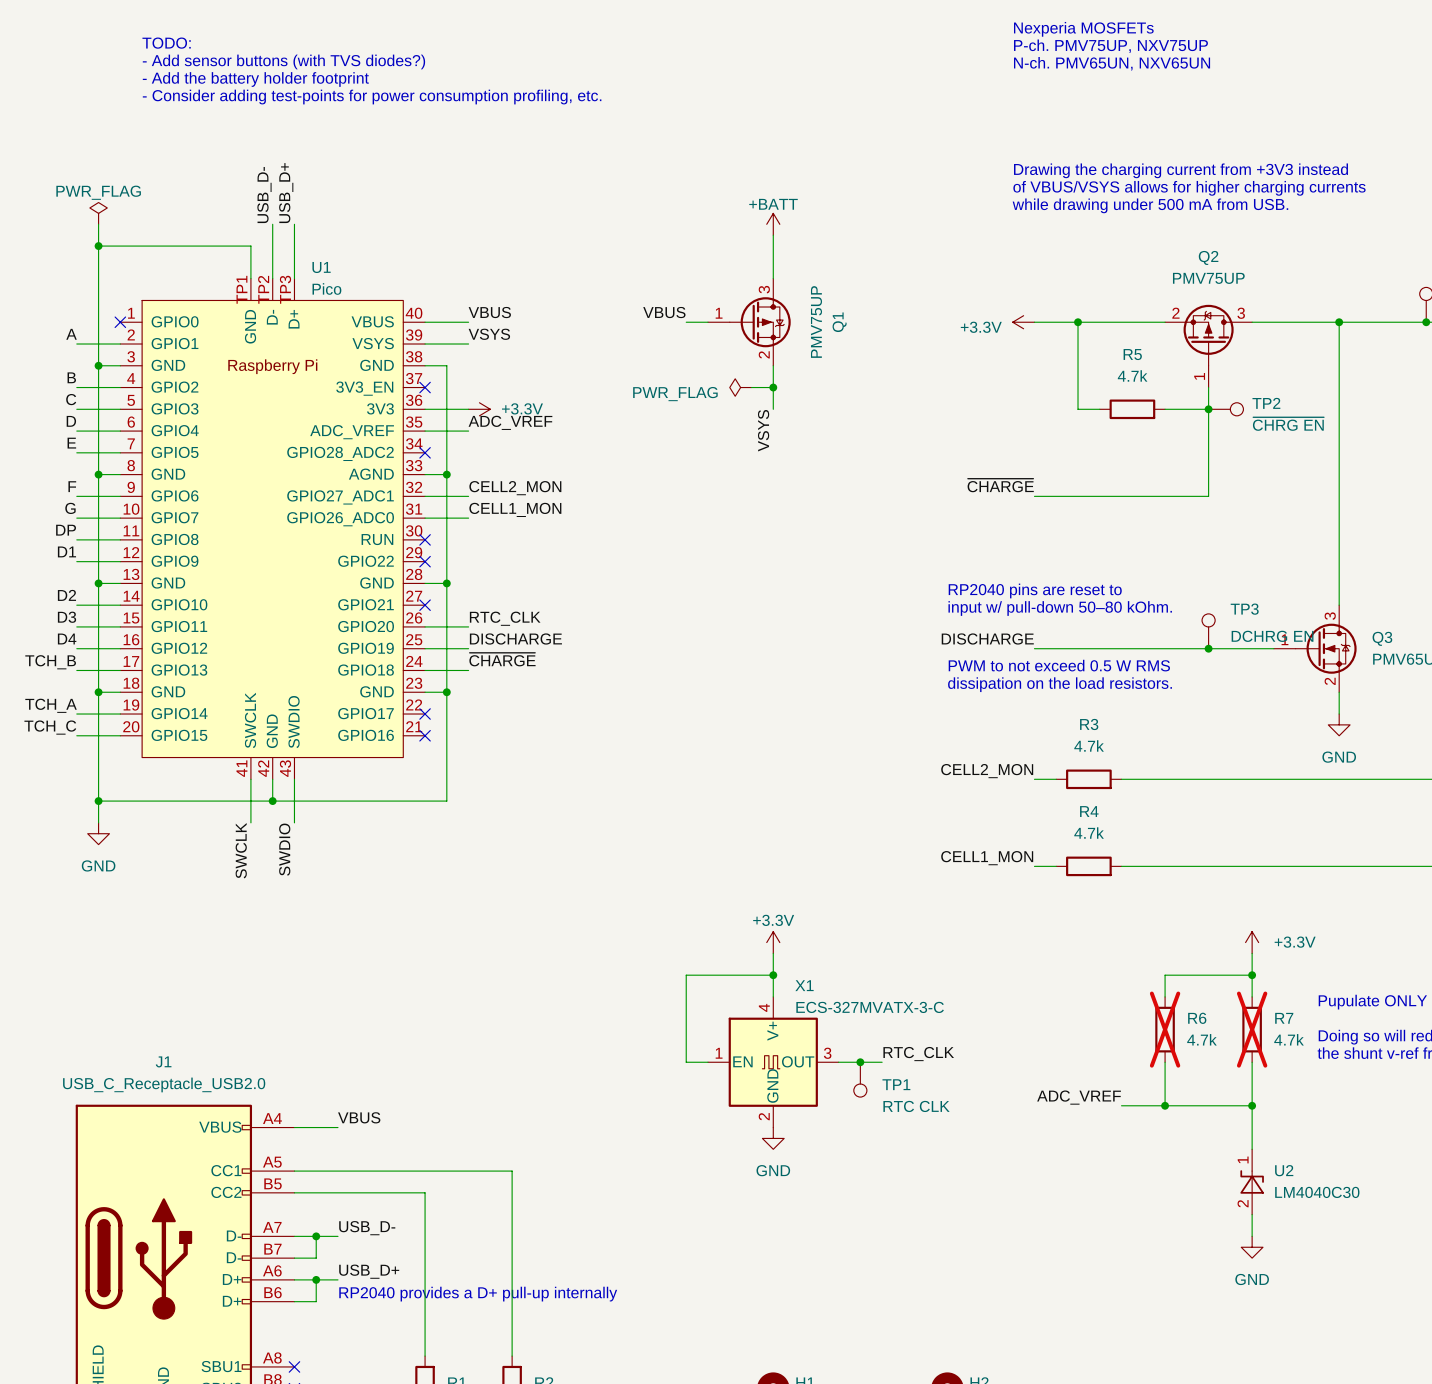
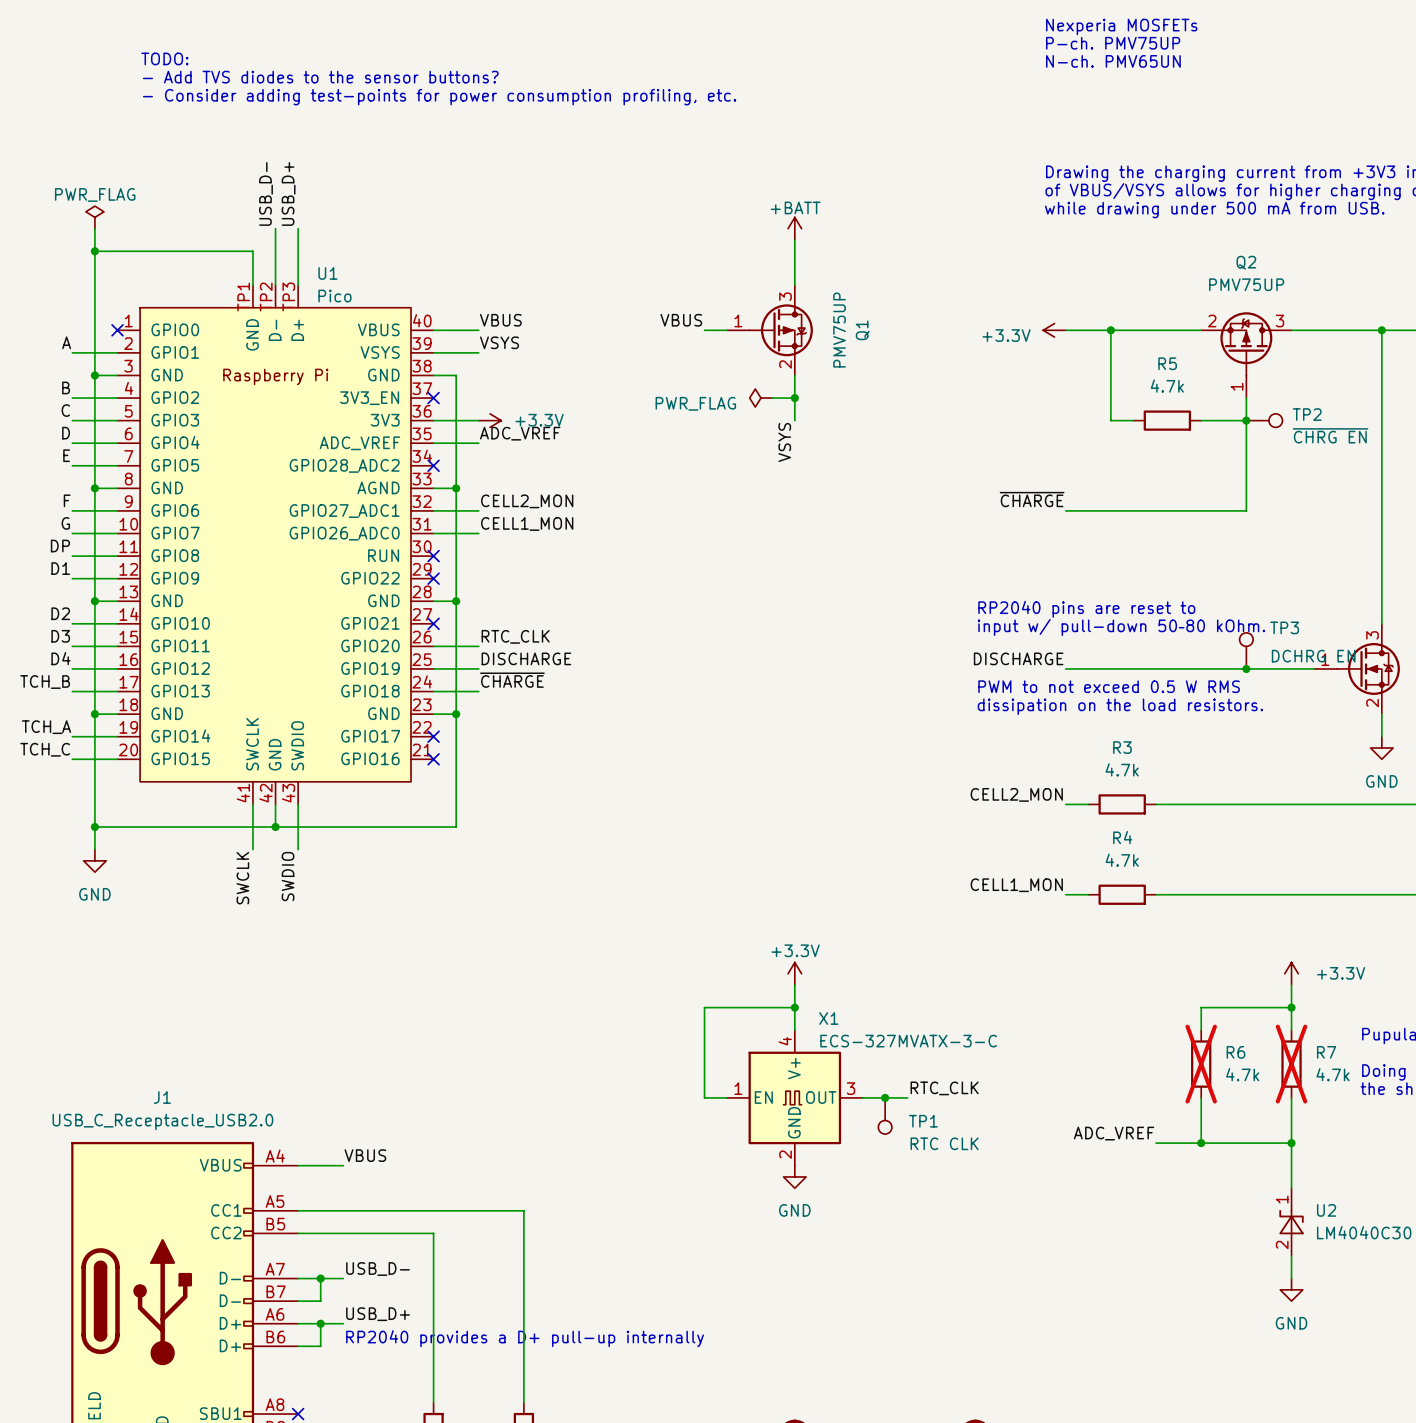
text: TODO: (166, 43) -> none
text: P-ch. PMV75UP, NXV75UP (1110, 46) -> P-ch. PMV75UP (1113, 43)
text: - Add sensor buttons (with TVS diodes?) (283, 61) -> TODO: (164, 58)
text: N-ch. PMV65UN, NXV65UN (1112, 63) -> N-ch. PMV65UN (1113, 61)
text: - Add the battery holder footprint (255, 79) -> - Add TVS diodes to the sensor buttons? (320, 77)

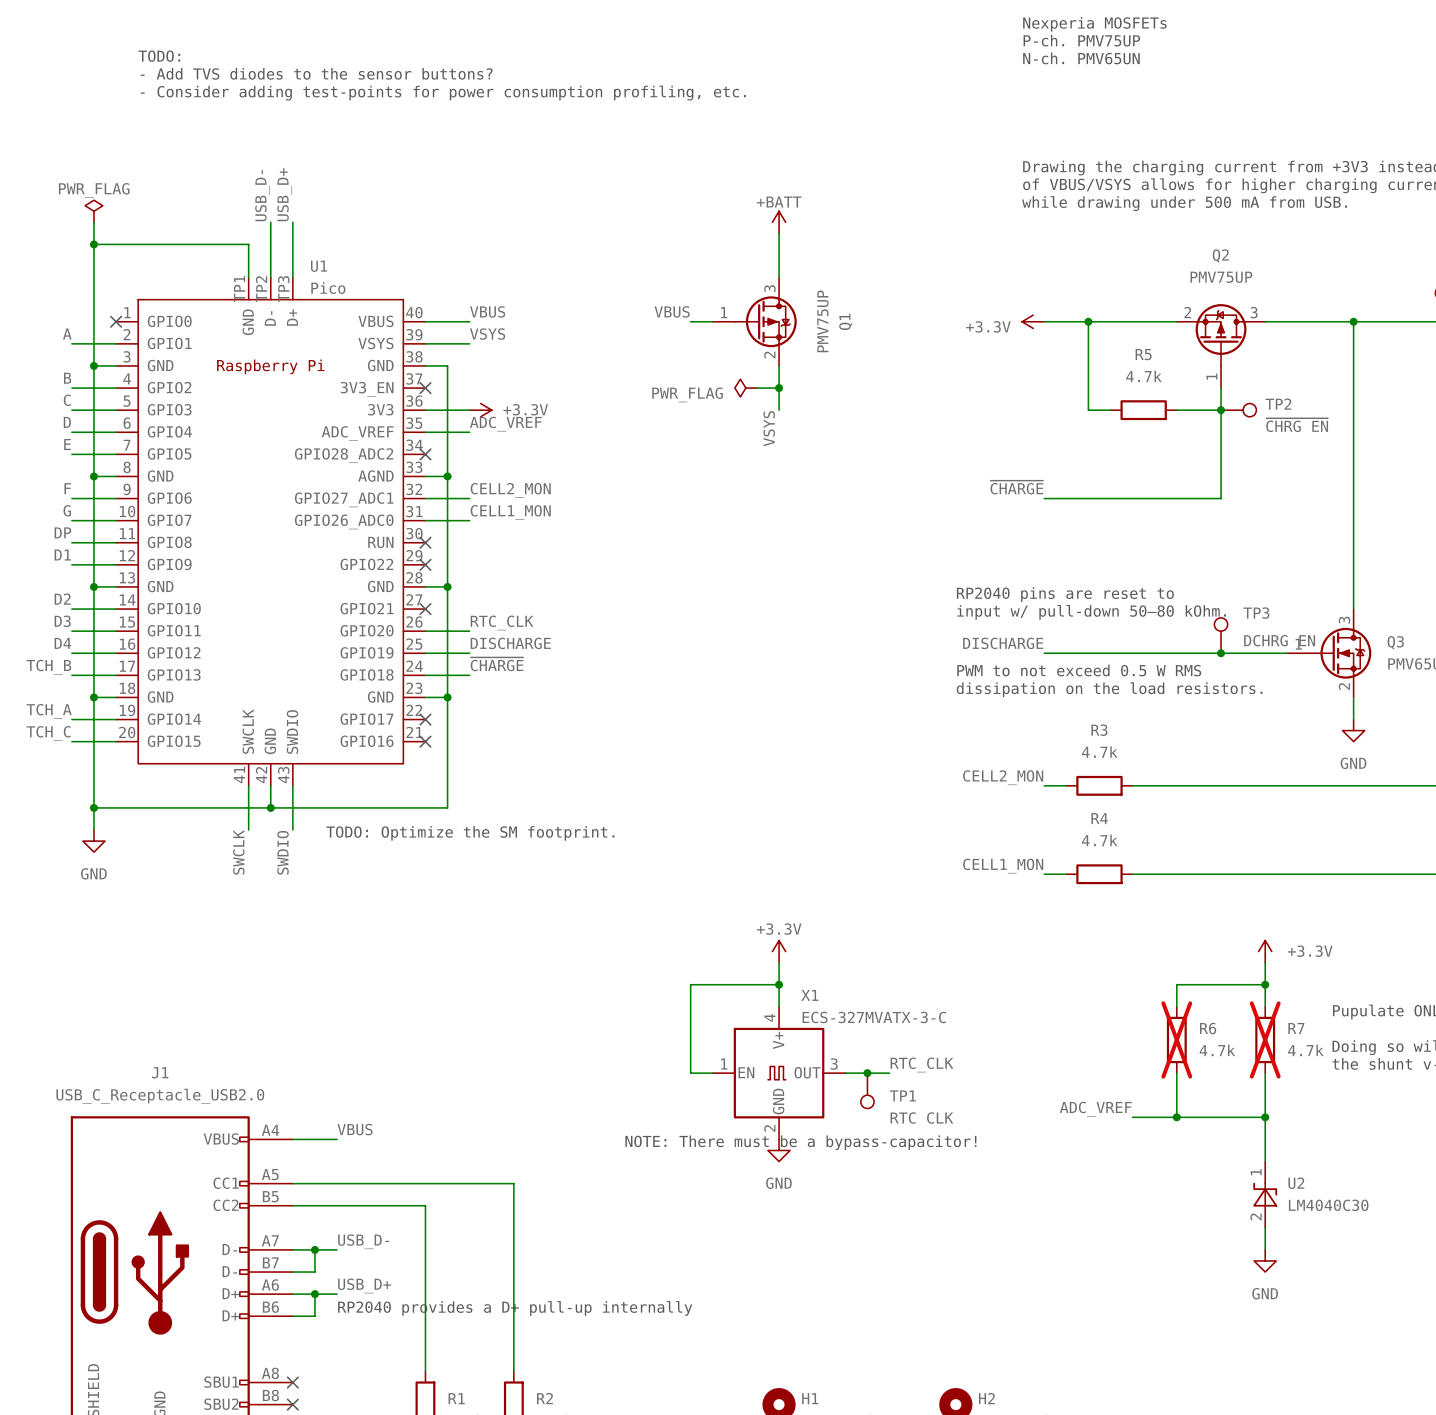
text: none -> TODO: Optimize the SM footprint. (470, 833)
text: none -> NOTE: There must be a bypass-capacitor! (800, 1142)

